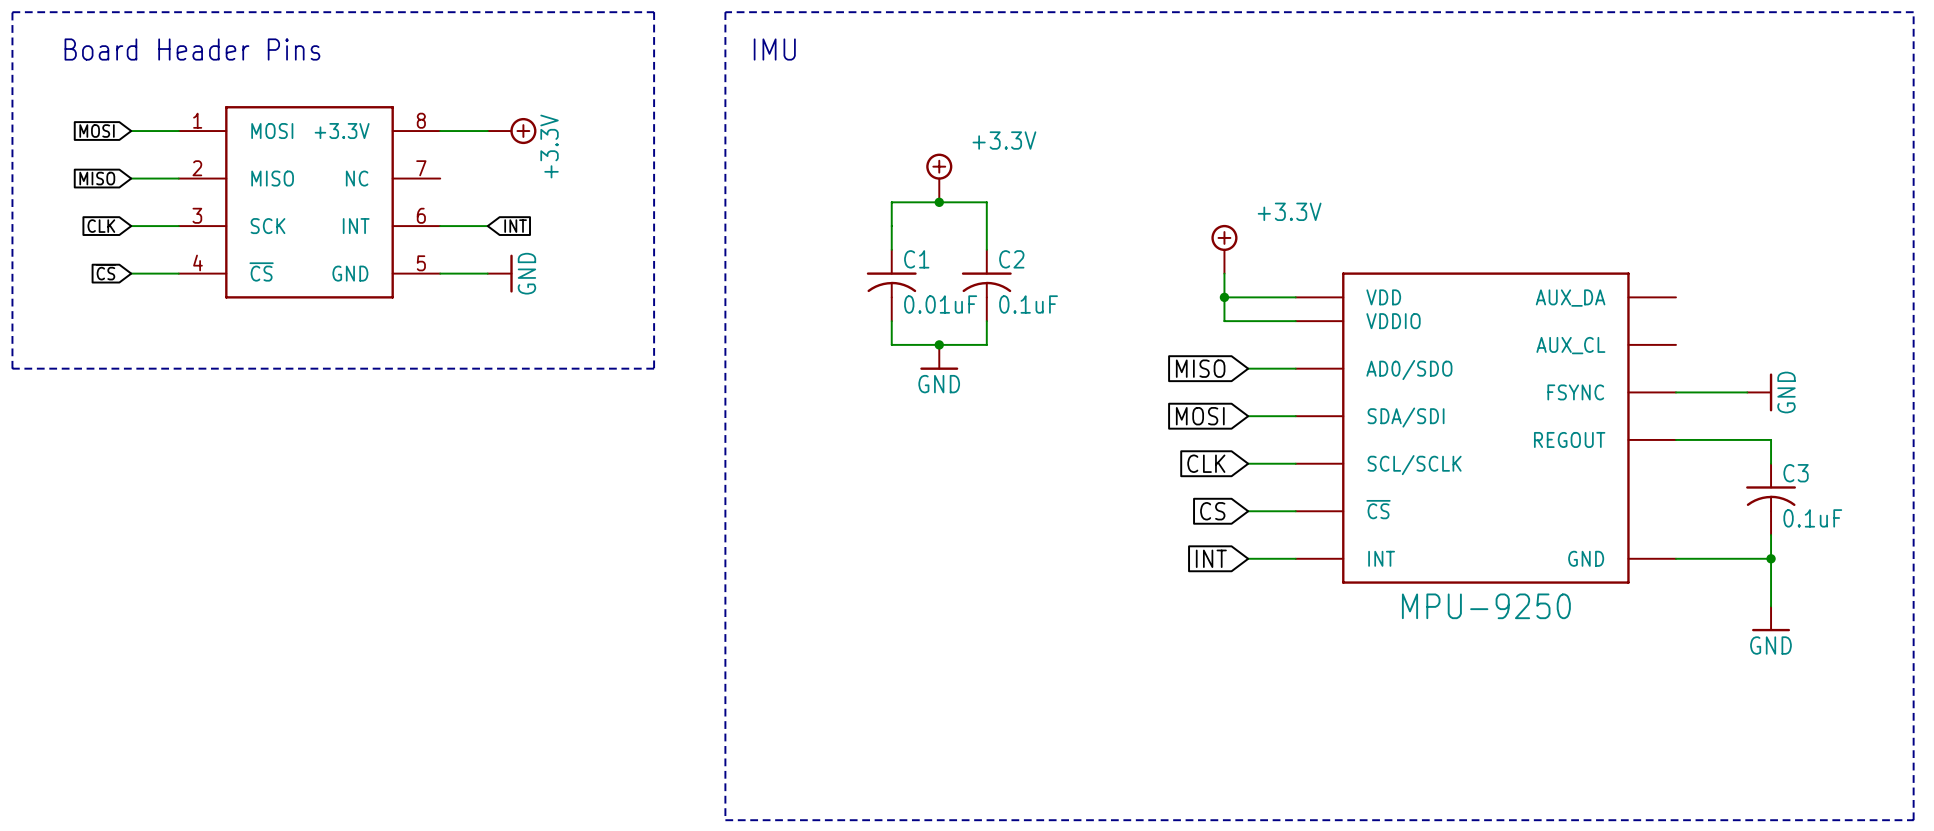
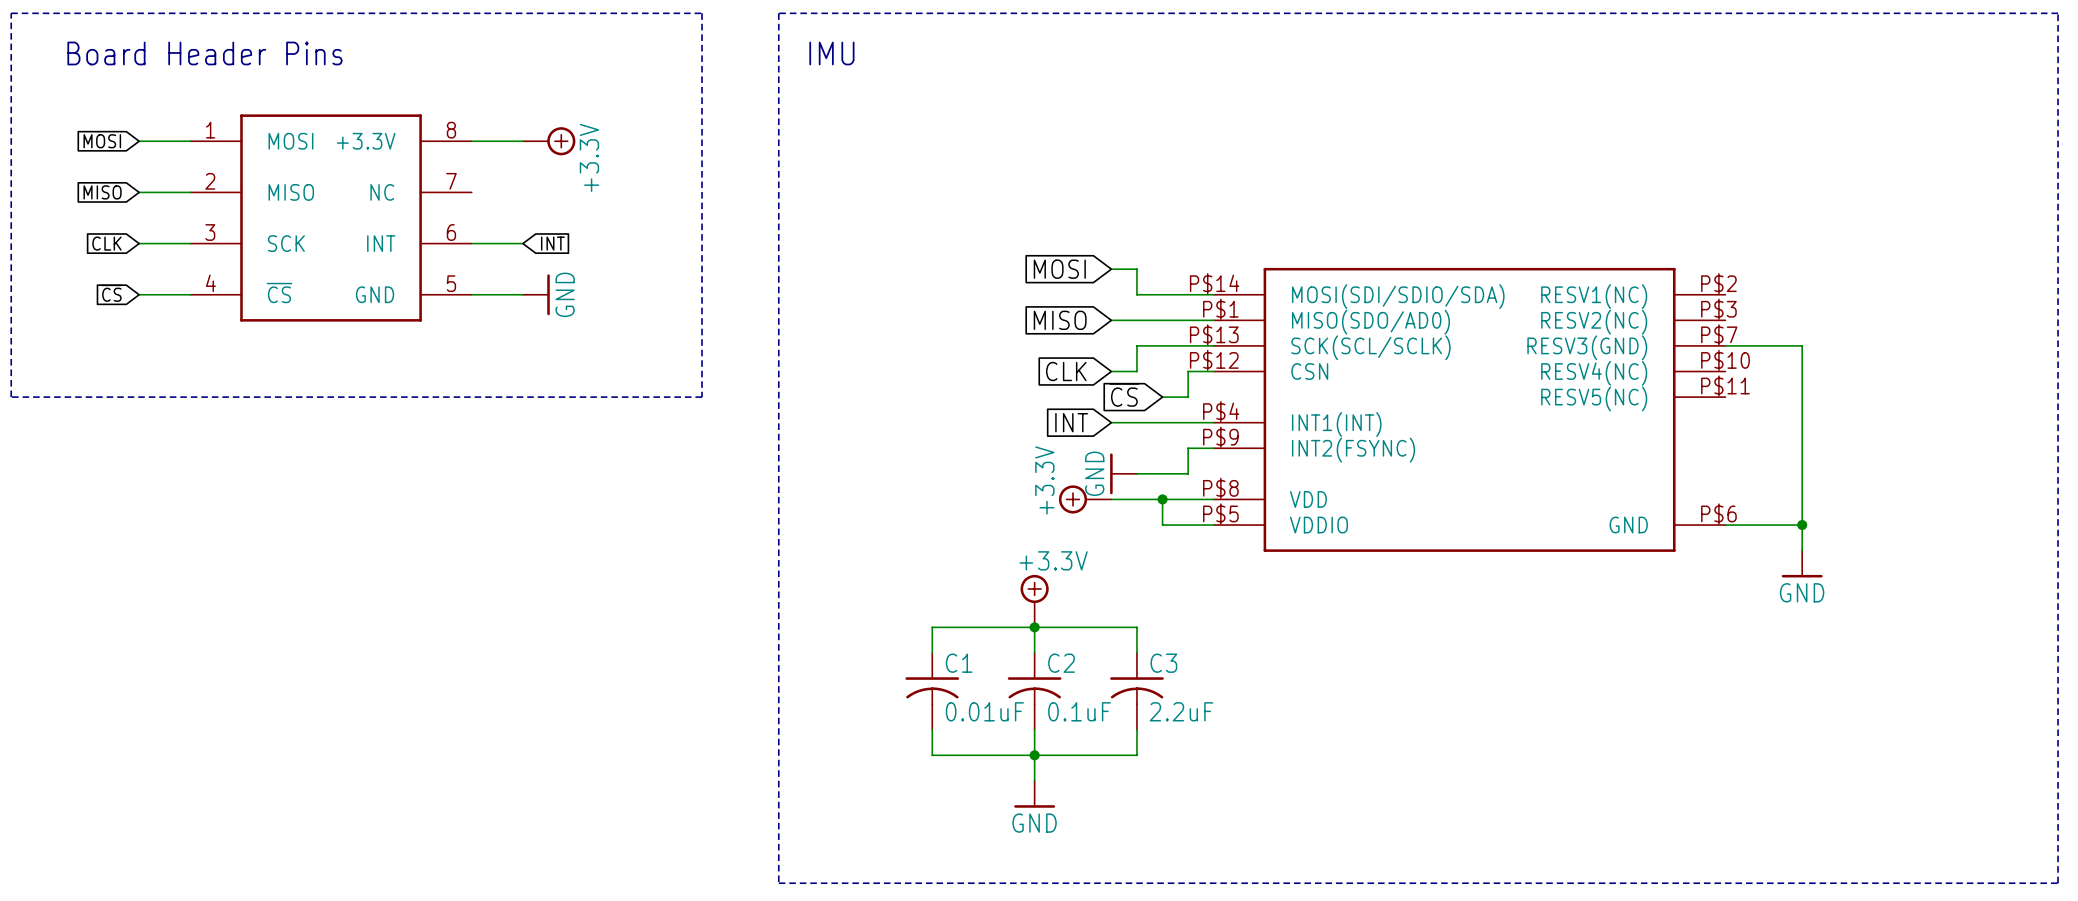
power symbol: +3.3V (939, 177) -> none
junction: (939, 202) -> none
wire: (891, 249) (891, 202) (986, 202) (986, 249) -> none
global label: none -> MOSI (1059, 269)
wire: none -> (1111, 269) (1136, 269) (1136, 294) (1213, 294)
power symbol: +3.3V (1224, 249) -> none
wire: (1224, 273) (1224, 321) (1295, 321) -> none
C1 position: (891, 285) -> (932, 691)
C2 position: (986, 285) -> (1034, 691)
wire: none -> (1111, 320) (1213, 320)
wire: (1224, 297) (1295, 297) -> none
junction: (1224, 297) -> none
wire: (891, 321) (891, 344) (986, 344) (986, 321) -> none
wire: none -> (1213, 345) (1136, 345) (1136, 371) (1111, 371)
wire: none -> (1725, 345) (1802, 345) (1802, 550)
junction: (939, 344) -> none
global label: none -> CLK (1066, 371)
wire: none -> (1213, 371) (1188, 371) (1188, 397) (1162, 397)
power symbol position: GND (939, 357) -> GND (1123, 473)
global label: none -> ~{CS} (1124, 395)
power symbol rotation: 0° (939, 368) -> 90° clockwise (1111, 473)
global label position: MISO (1200, 368) -> MISO (1060, 320)
wire: (1248, 368) (1295, 368) -> none
part: none -> (1469, 409)
global label: none -> INT (1071, 422)
wire: none -> (1111, 422) (1213, 422)
wire: (1675, 392) (1747, 392) -> (1725, 525) (1802, 525)
power symbol: GND (1759, 392) -> none
wire: none -> (1213, 448) (1188, 448) (1188, 473) (1136, 473)
global label: MOSI (1200, 416) -> none
wire: (1248, 416) (1295, 416) -> none
part: MPU-9250 (1485, 428) -> none
wire: (1675, 439) (1771, 439) (1771, 463) -> none
power symbol: none -> +3.3V (1085, 499)
wire: none -> (1111, 499) (1213, 499)
wire: none -> (1162, 499) (1162, 525) (1213, 525)
junction: none -> (1162, 499)
global label: CLK (1206, 463) -> none
wire: (1248, 463) (1295, 463) -> none
junction: none -> (1802, 525)
C3 position: (1771, 499) -> (1136, 691)
global label: CS (1212, 511) -> none
C3 value: 0.1uF (1812, 518) -> 2.2uF (1181, 711)
power symbol: none -> GND (1802, 564)
wire: (1771, 535) (1771, 606) -> none
power symbol: none -> +3.3V (1034, 601)
global label: INT (1211, 558) -> none
wire: (1248, 558) (1295, 558) -> none
wire: (1675, 558) (1771, 558) -> none
junction: (1771, 558) -> none
wire: none -> (1034, 627) (1034, 652)
junction: none -> (1034, 627)
wire: none -> (932, 652) (932, 627) (1136, 627) (1136, 652)
power symbol: GND (1771, 618) -> none
wire: none -> (932, 729) (932, 755) (1136, 755) (1136, 729)
wire: none -> (1034, 729) (1034, 780)
junction: none -> (1034, 755)
power symbol: none -> GND (1034, 794)

